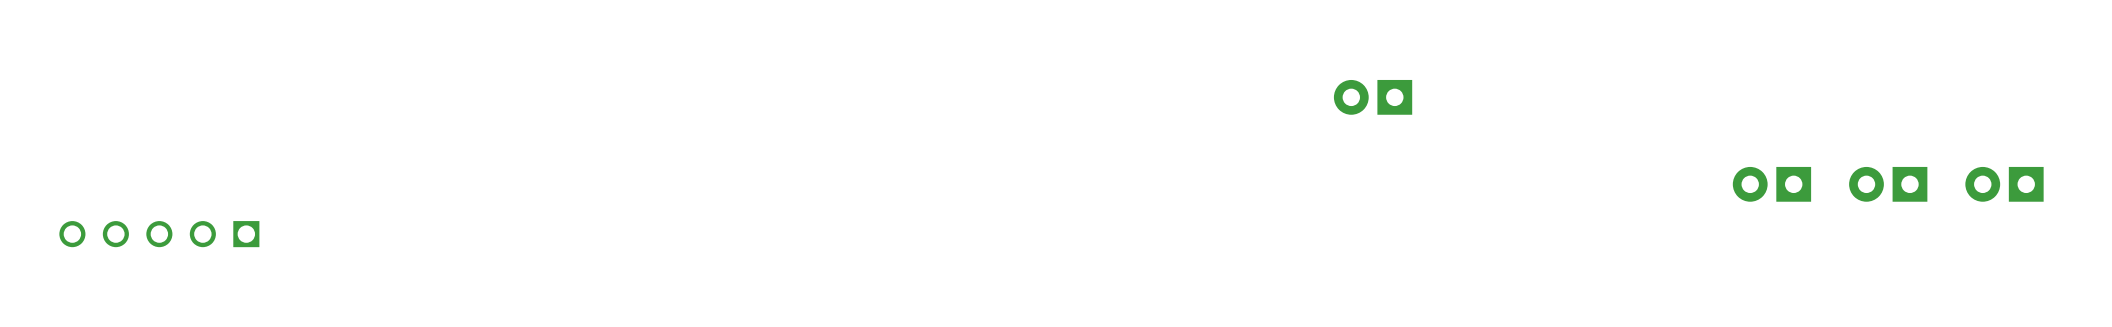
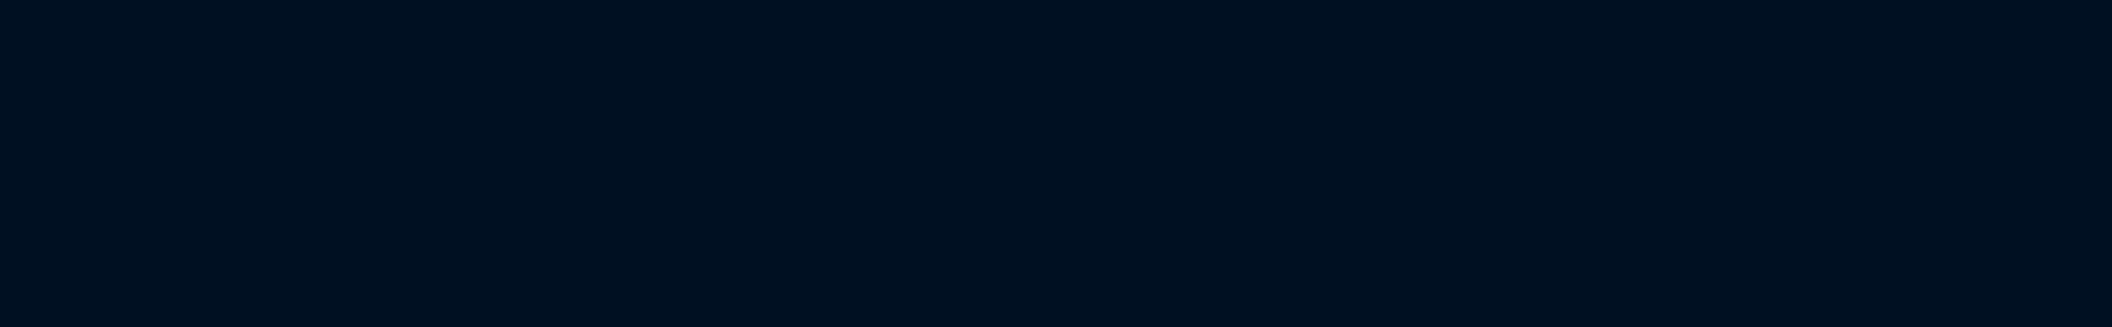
part: (1373, 97) -> none
part: (1771, 184) -> none
part: (1888, 184) -> none
part: (2004, 184) -> none
part: (159, 234) -> none

